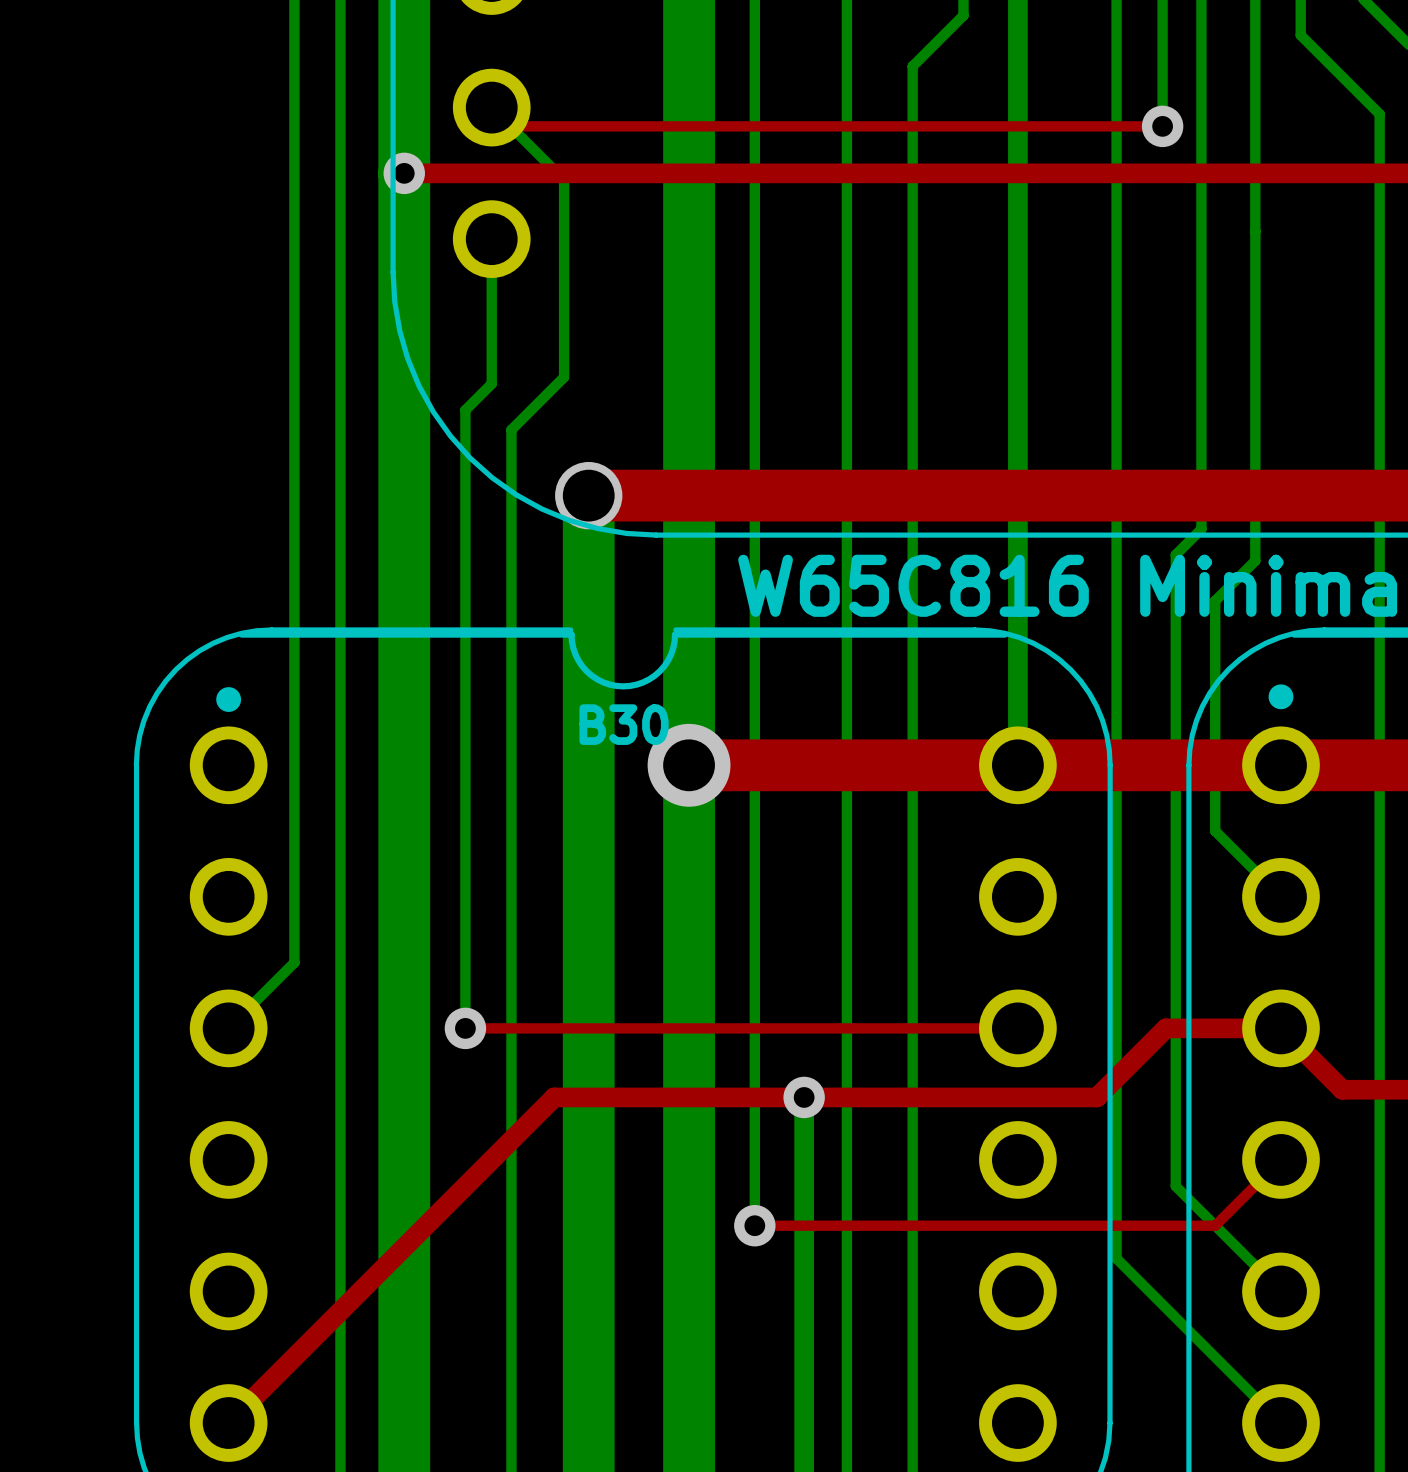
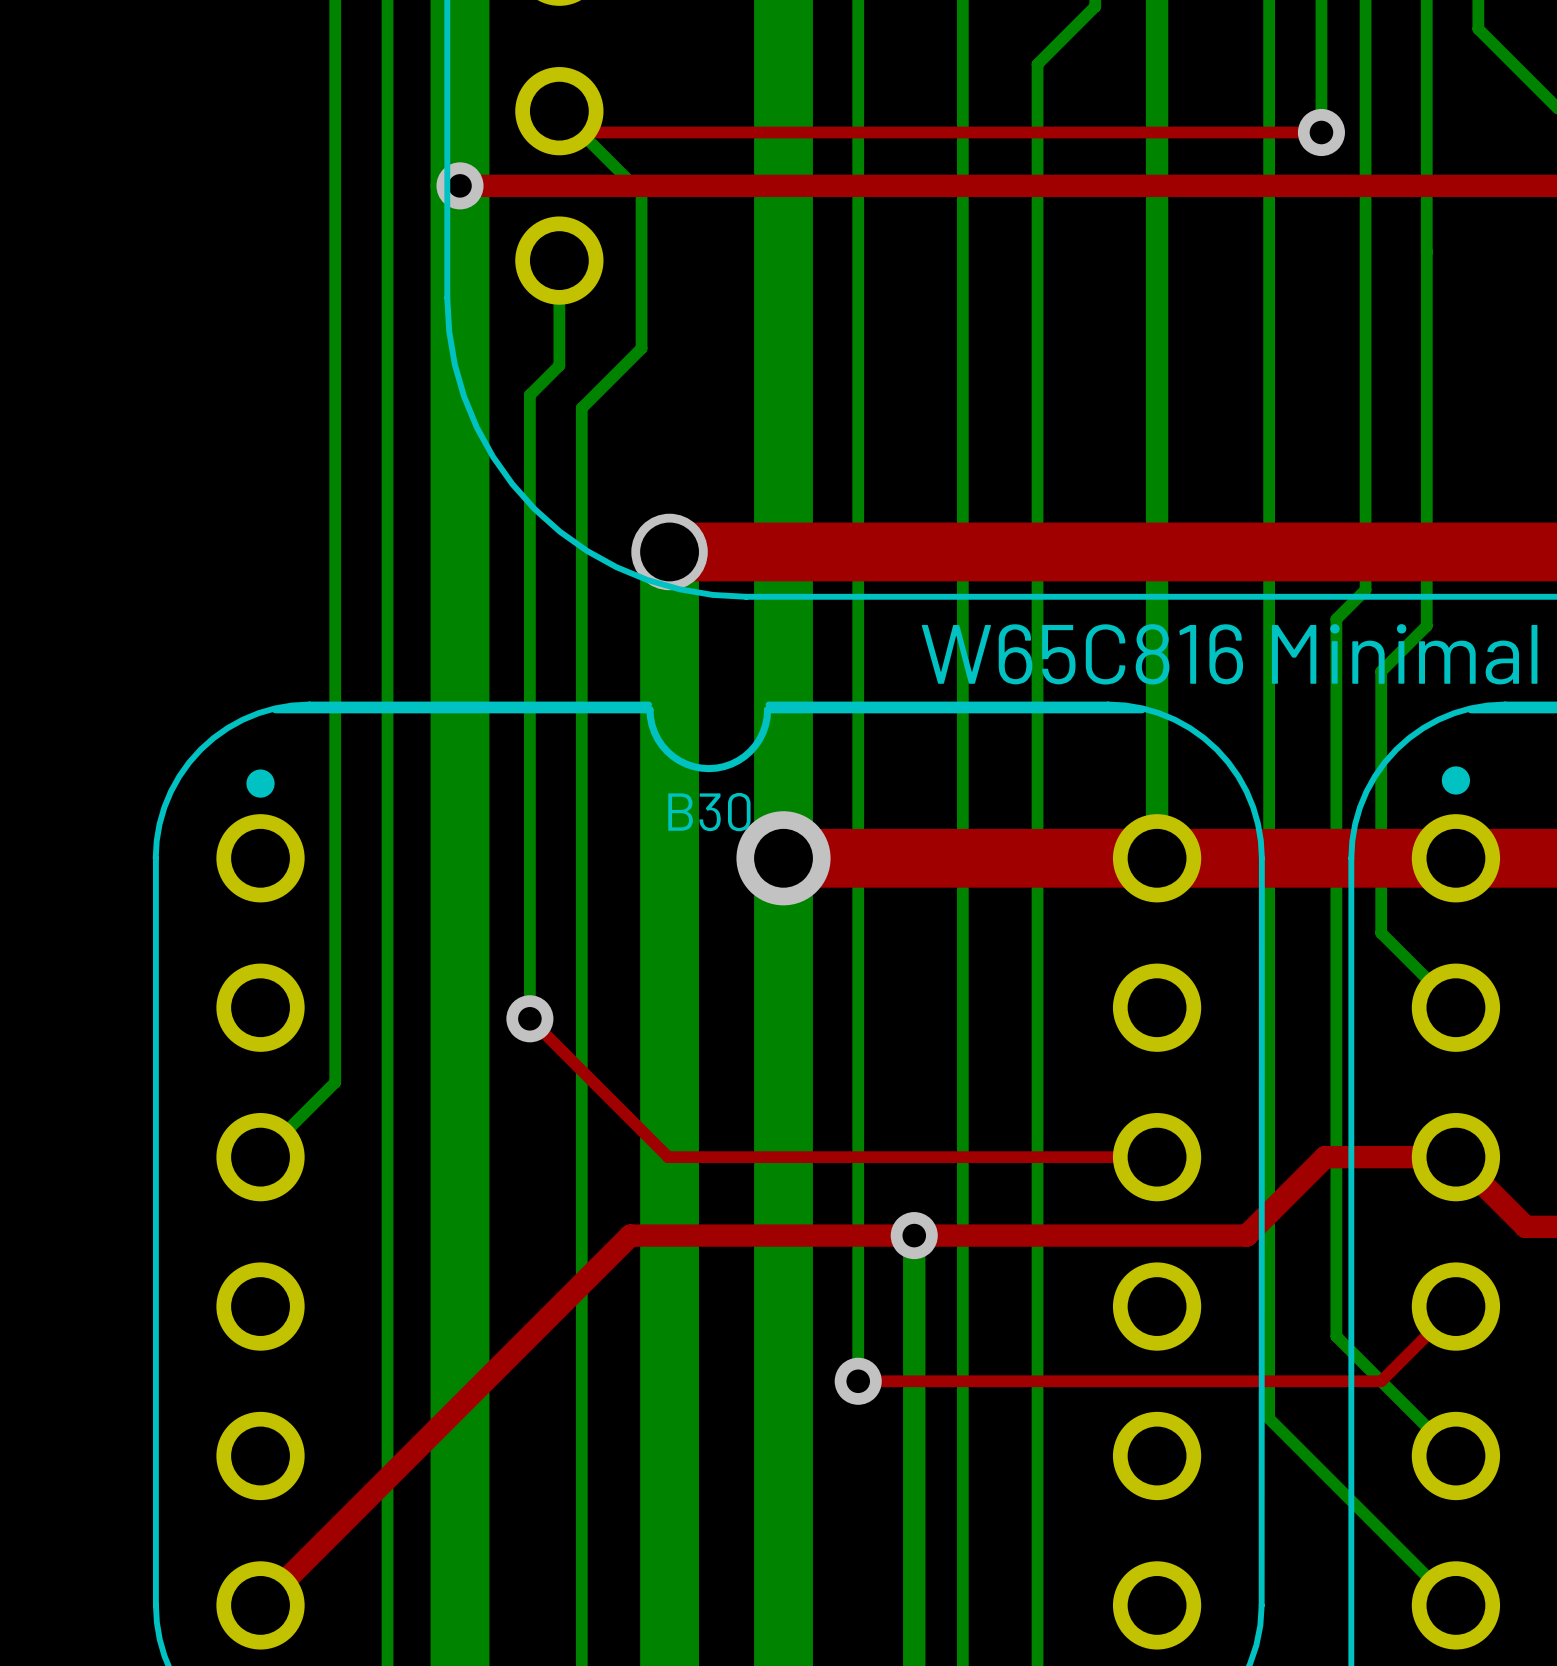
bottom track: (564, 316) (564, 377) (511, 429) -> (641, 348) (581, 408) (581, 477)
bottom track: (491, 331) (491, 383) (465, 410) (465, 1028) -> (559, 365) (529, 395) (529, 1018)
top track: (465, 1028) (587, 1028) -> (529, 1018) (668, 1157)
via position: (465, 1028) -> (529, 1018)

